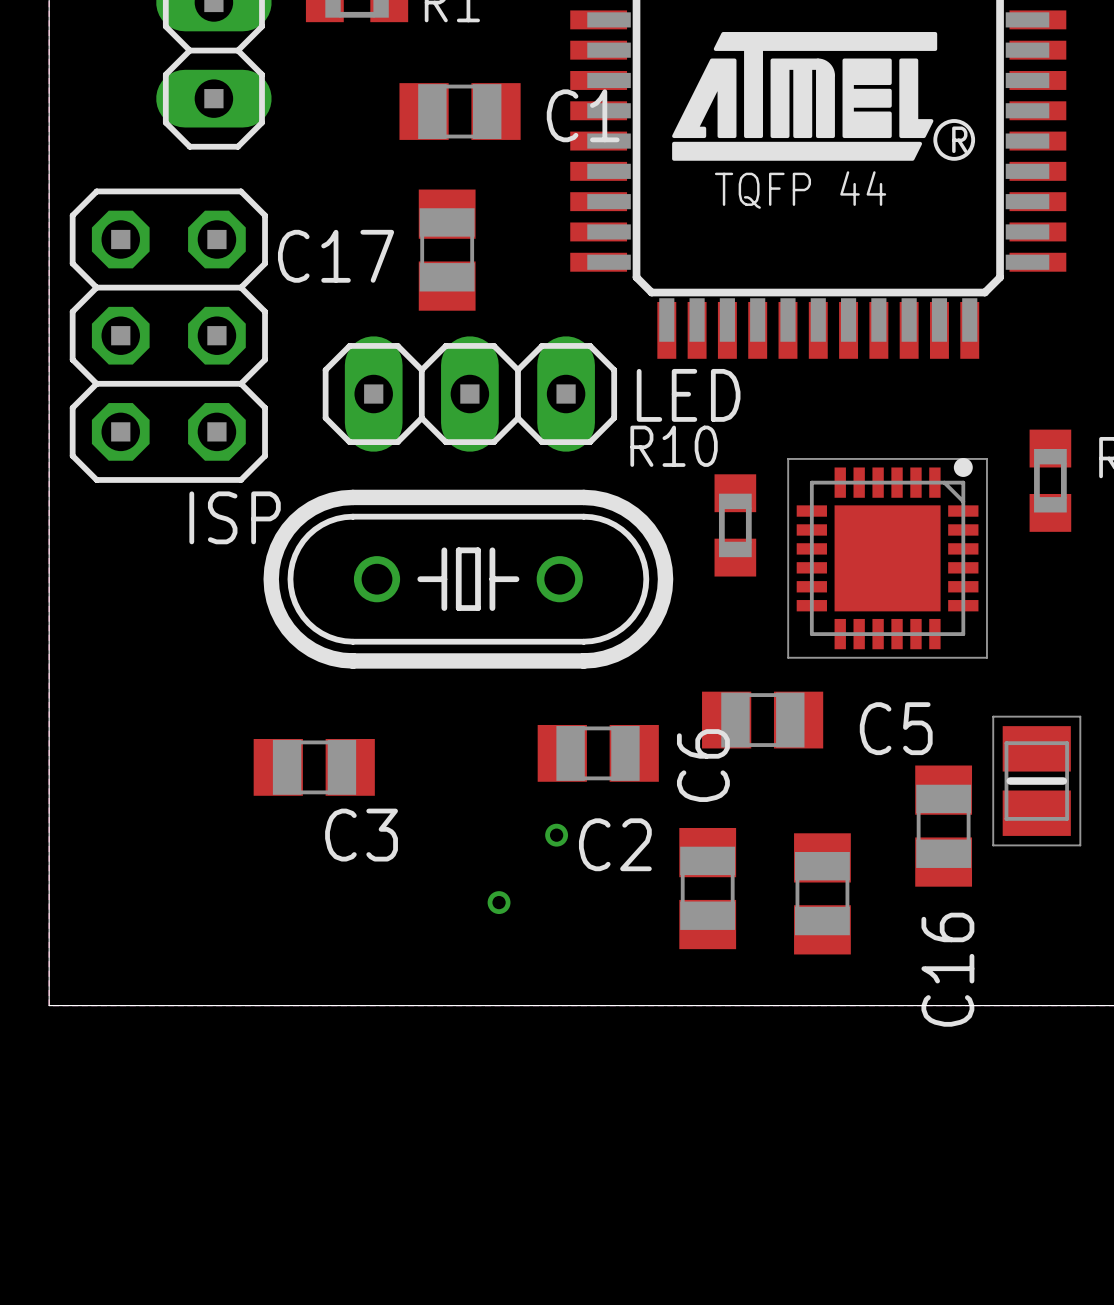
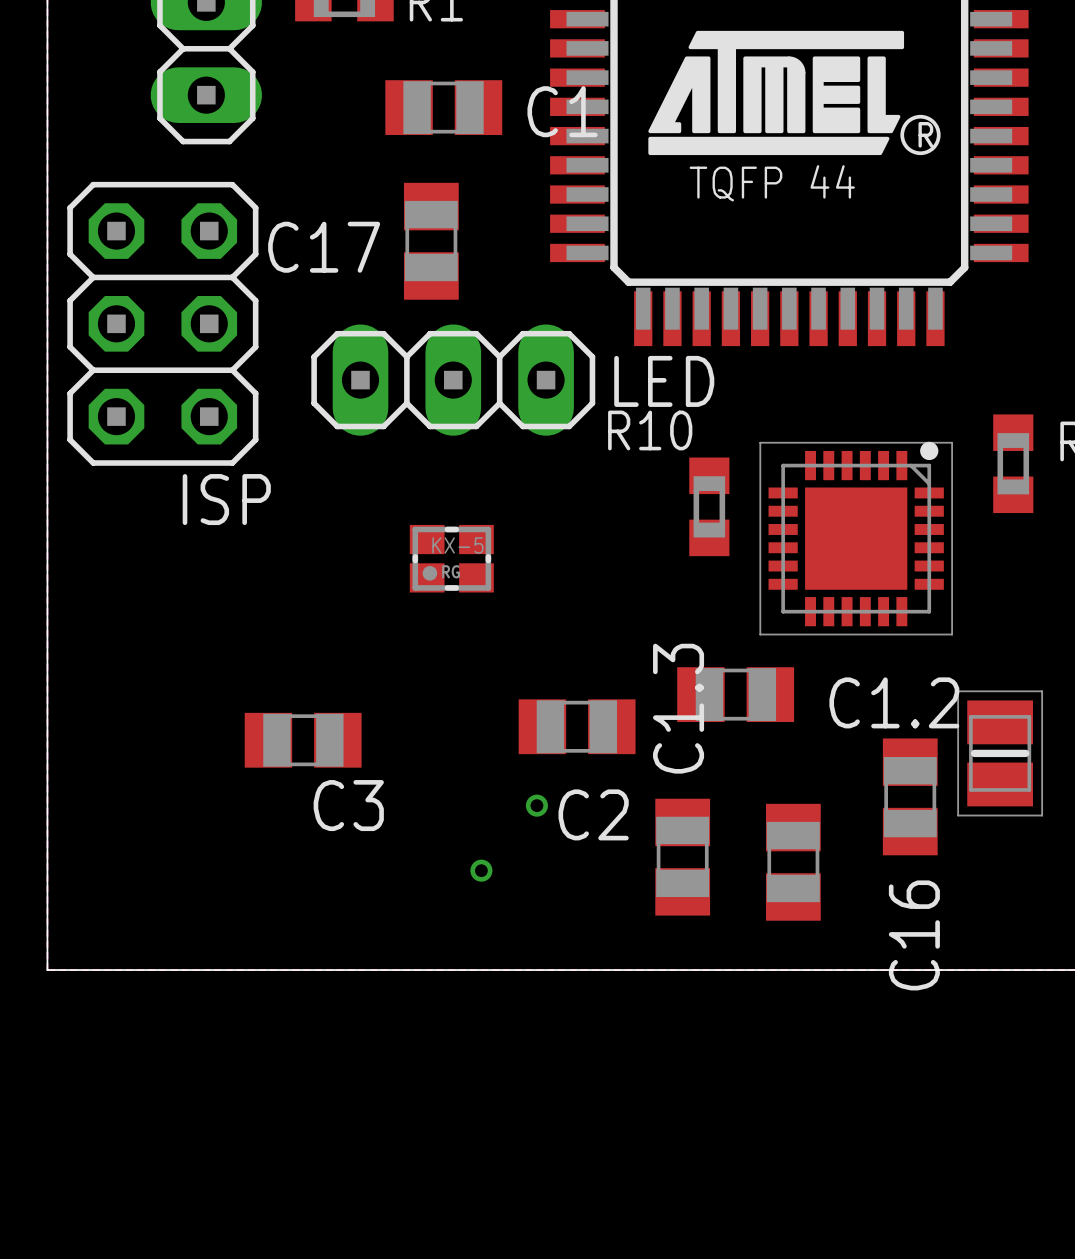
part footprint: [263, 489, 674, 669] -> [409, 524, 494, 593]
C5 name: C5 (896, 728) -> C1.2 (894, 702)
C6 name: C6 (703, 765) -> C1.3 (678, 708)

